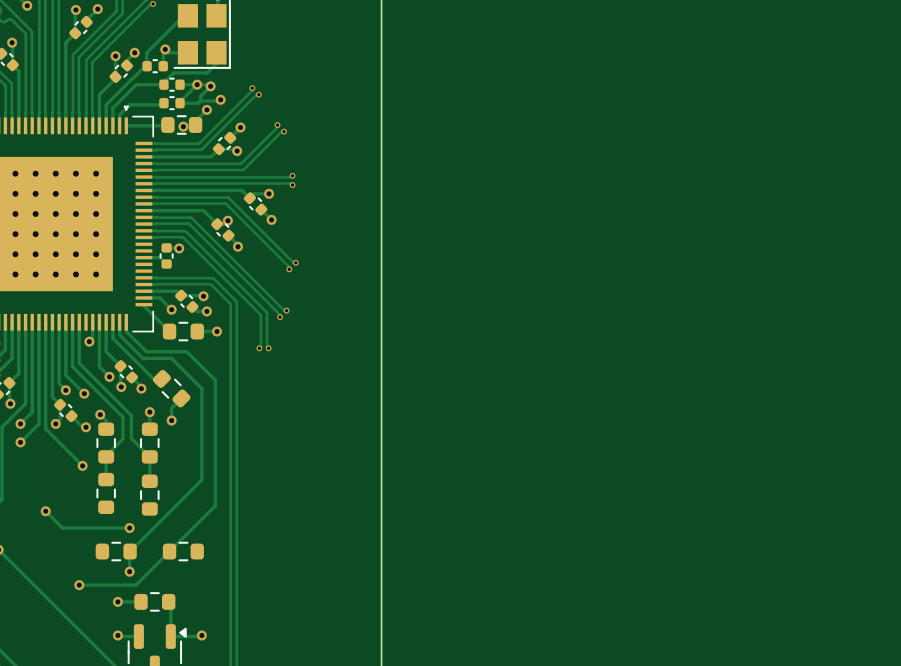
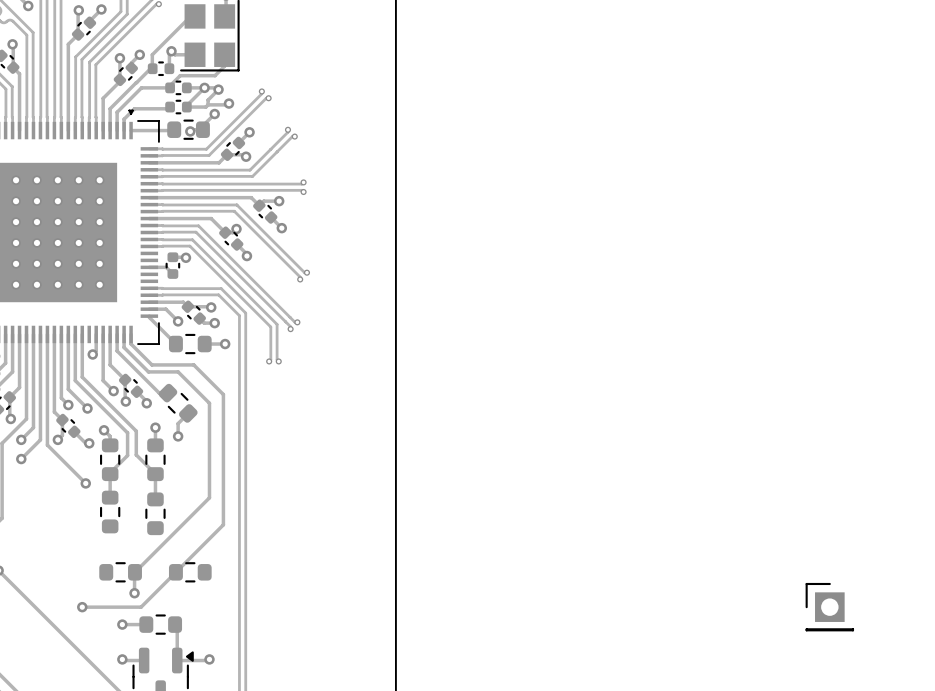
track: (45, 511) (62, 528) (129, 528) -> none
via: (45, 511) -> none
via: (129, 528) -> none
part: none -> (829, 607)

